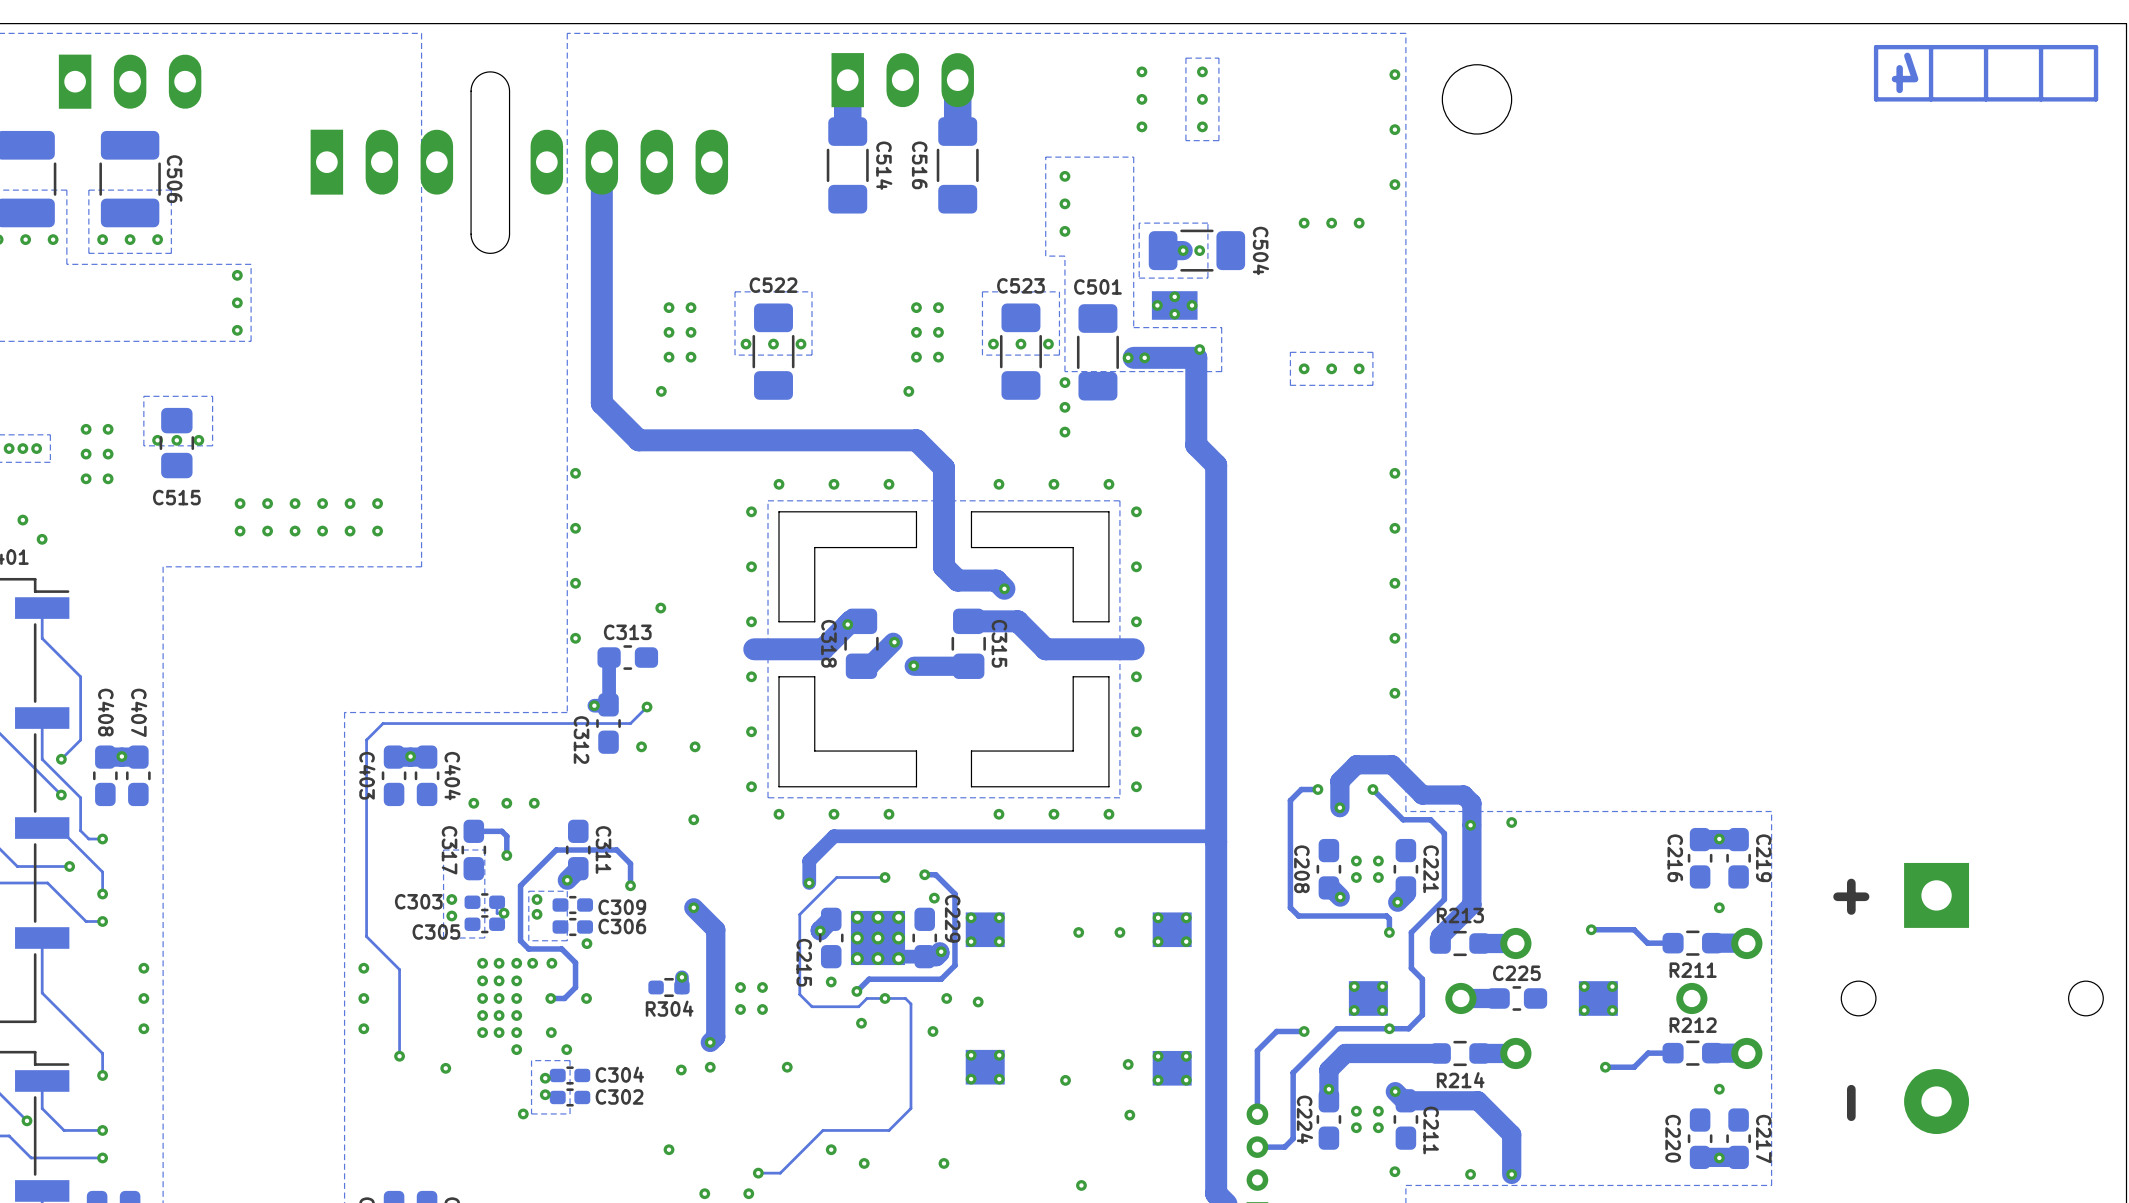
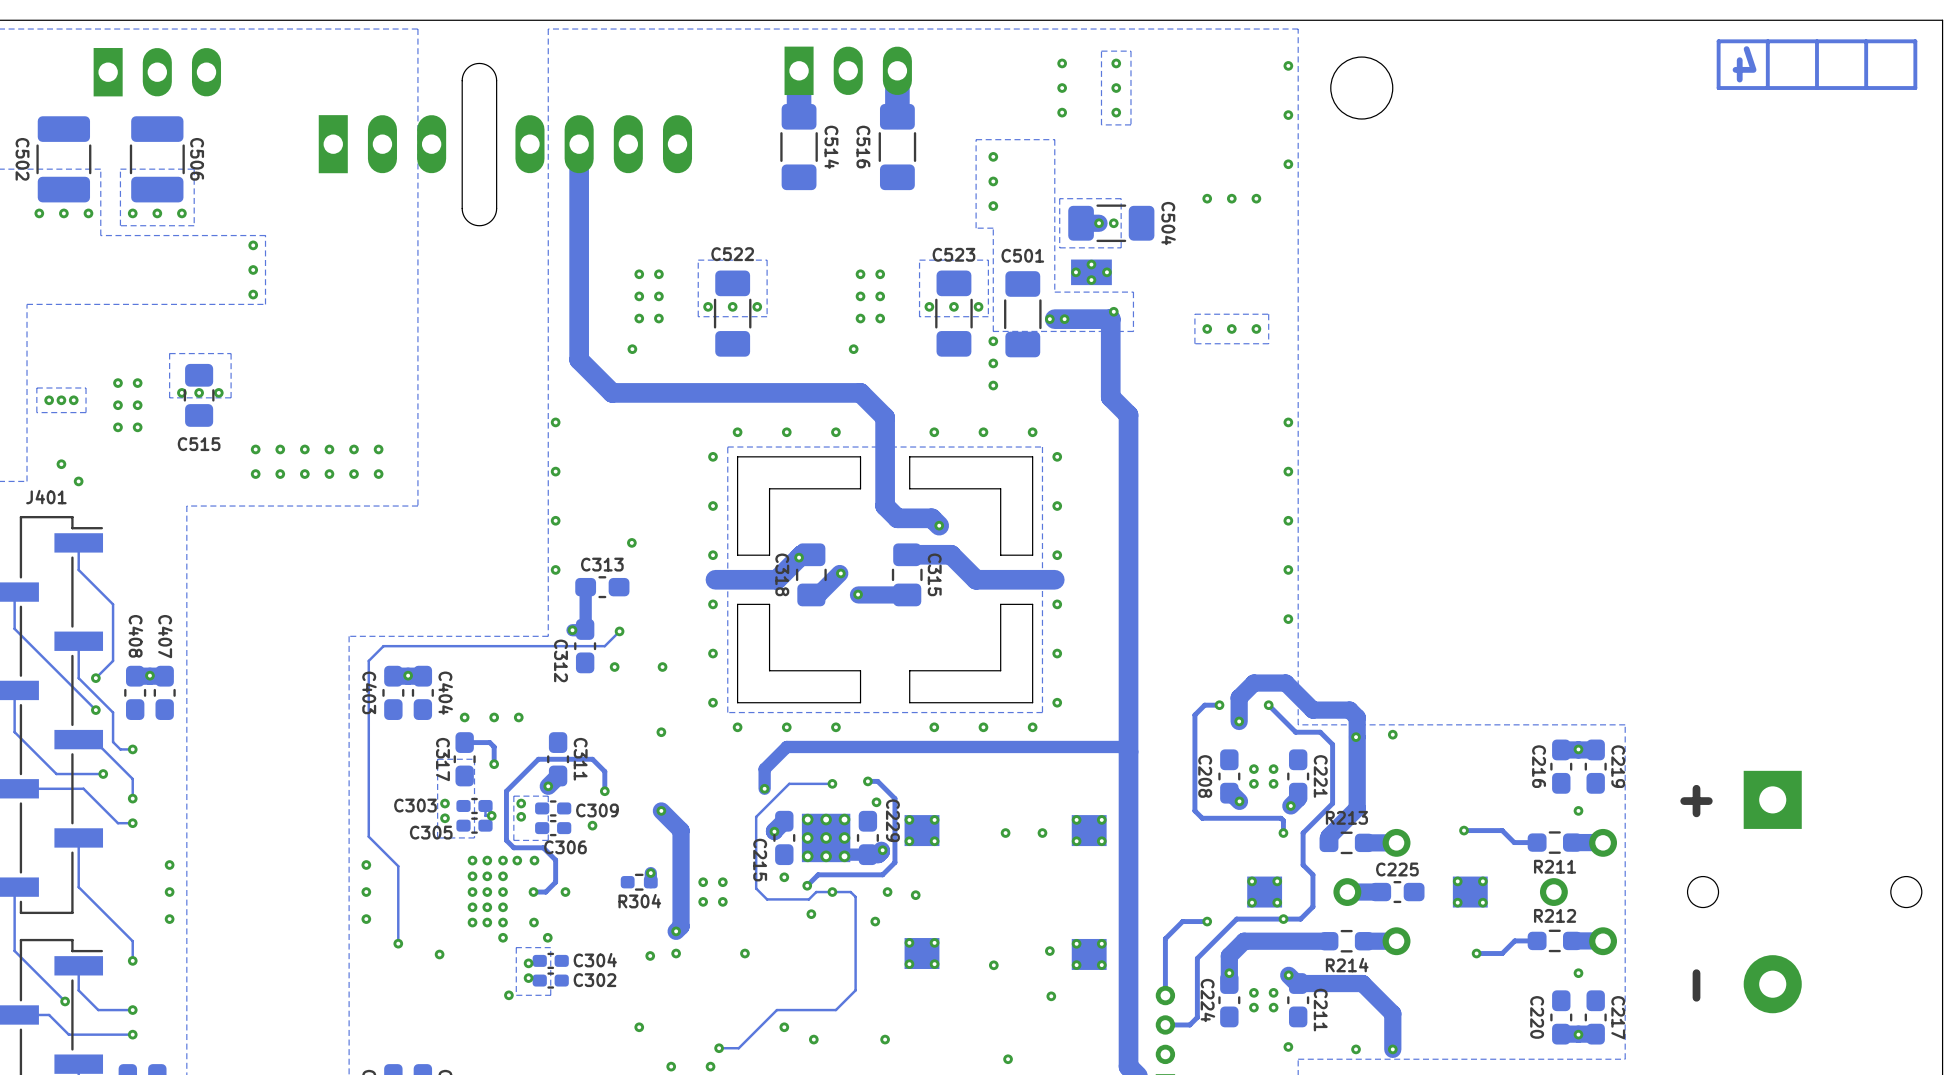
C306 name position: C306 (622, 926) -> C306 (565, 847)
via position: (586, 943) -> (592, 825)

